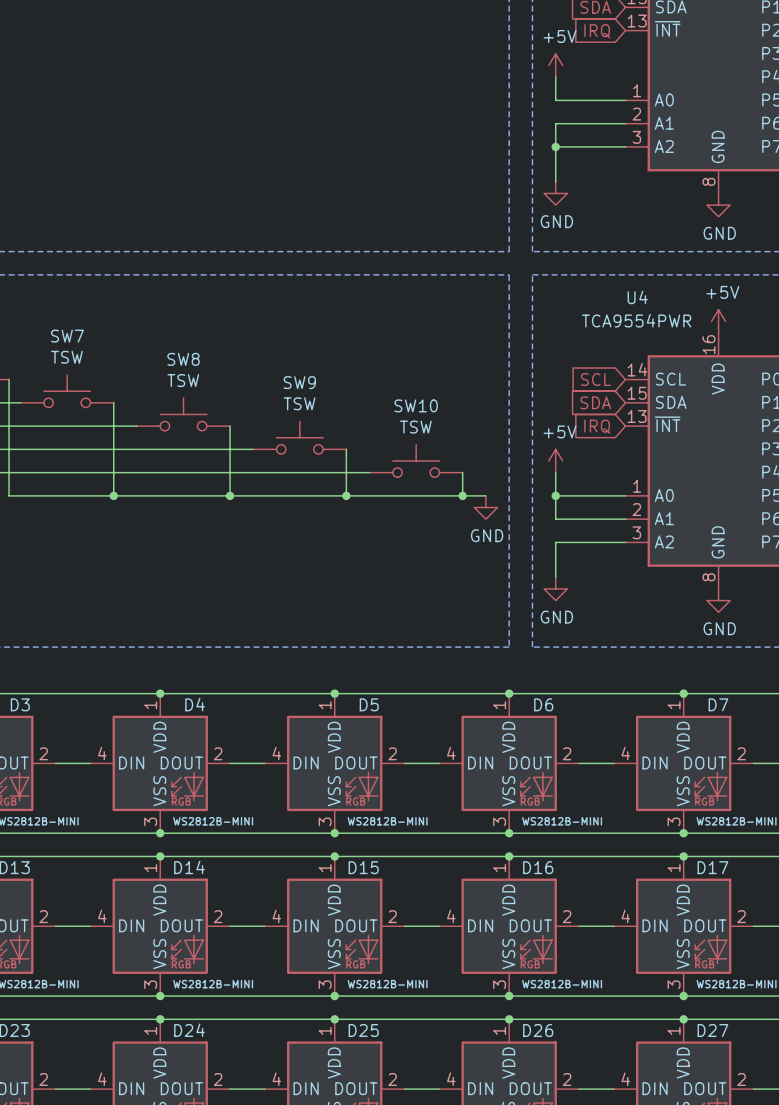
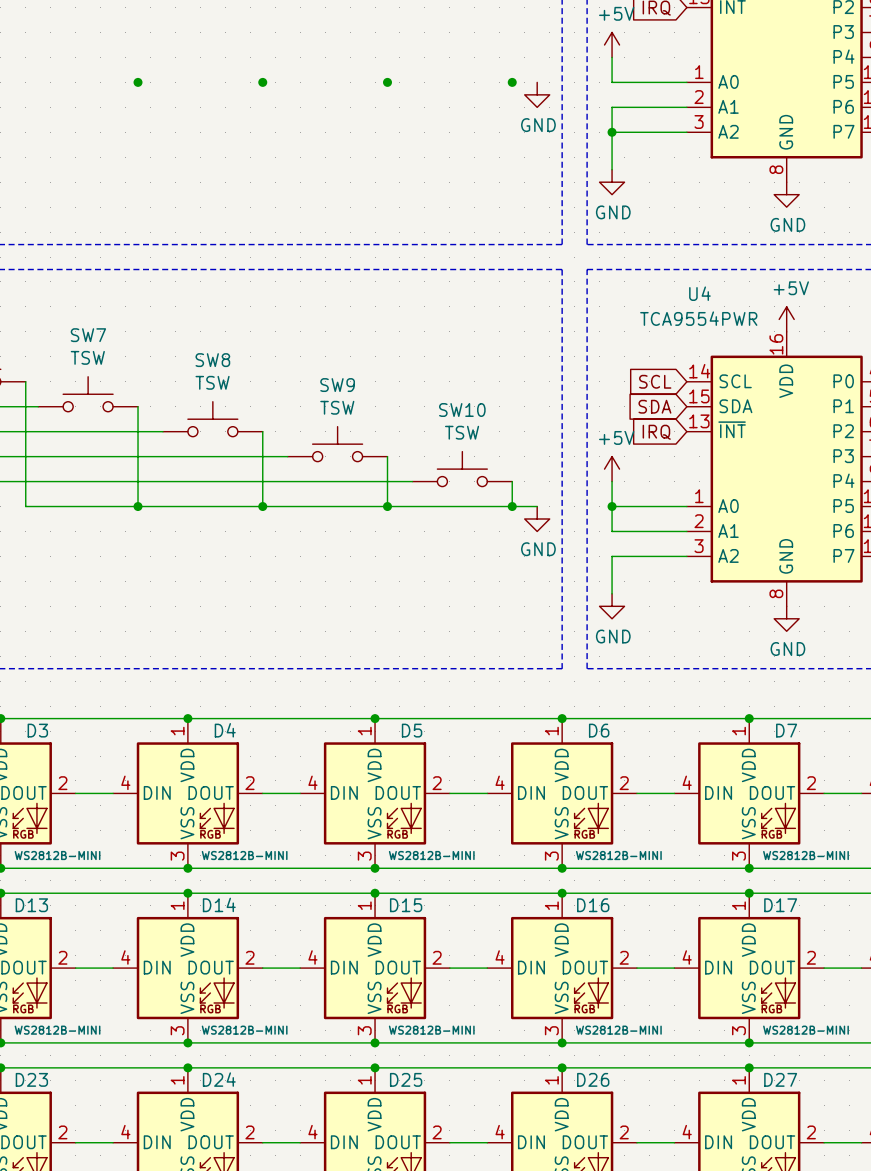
junction: none -> (138, 82)
junction: none -> (262, 82)
junction: none -> (387, 82)
junction: none -> (512, 82)
power symbol: none -> GND (537, 94)

